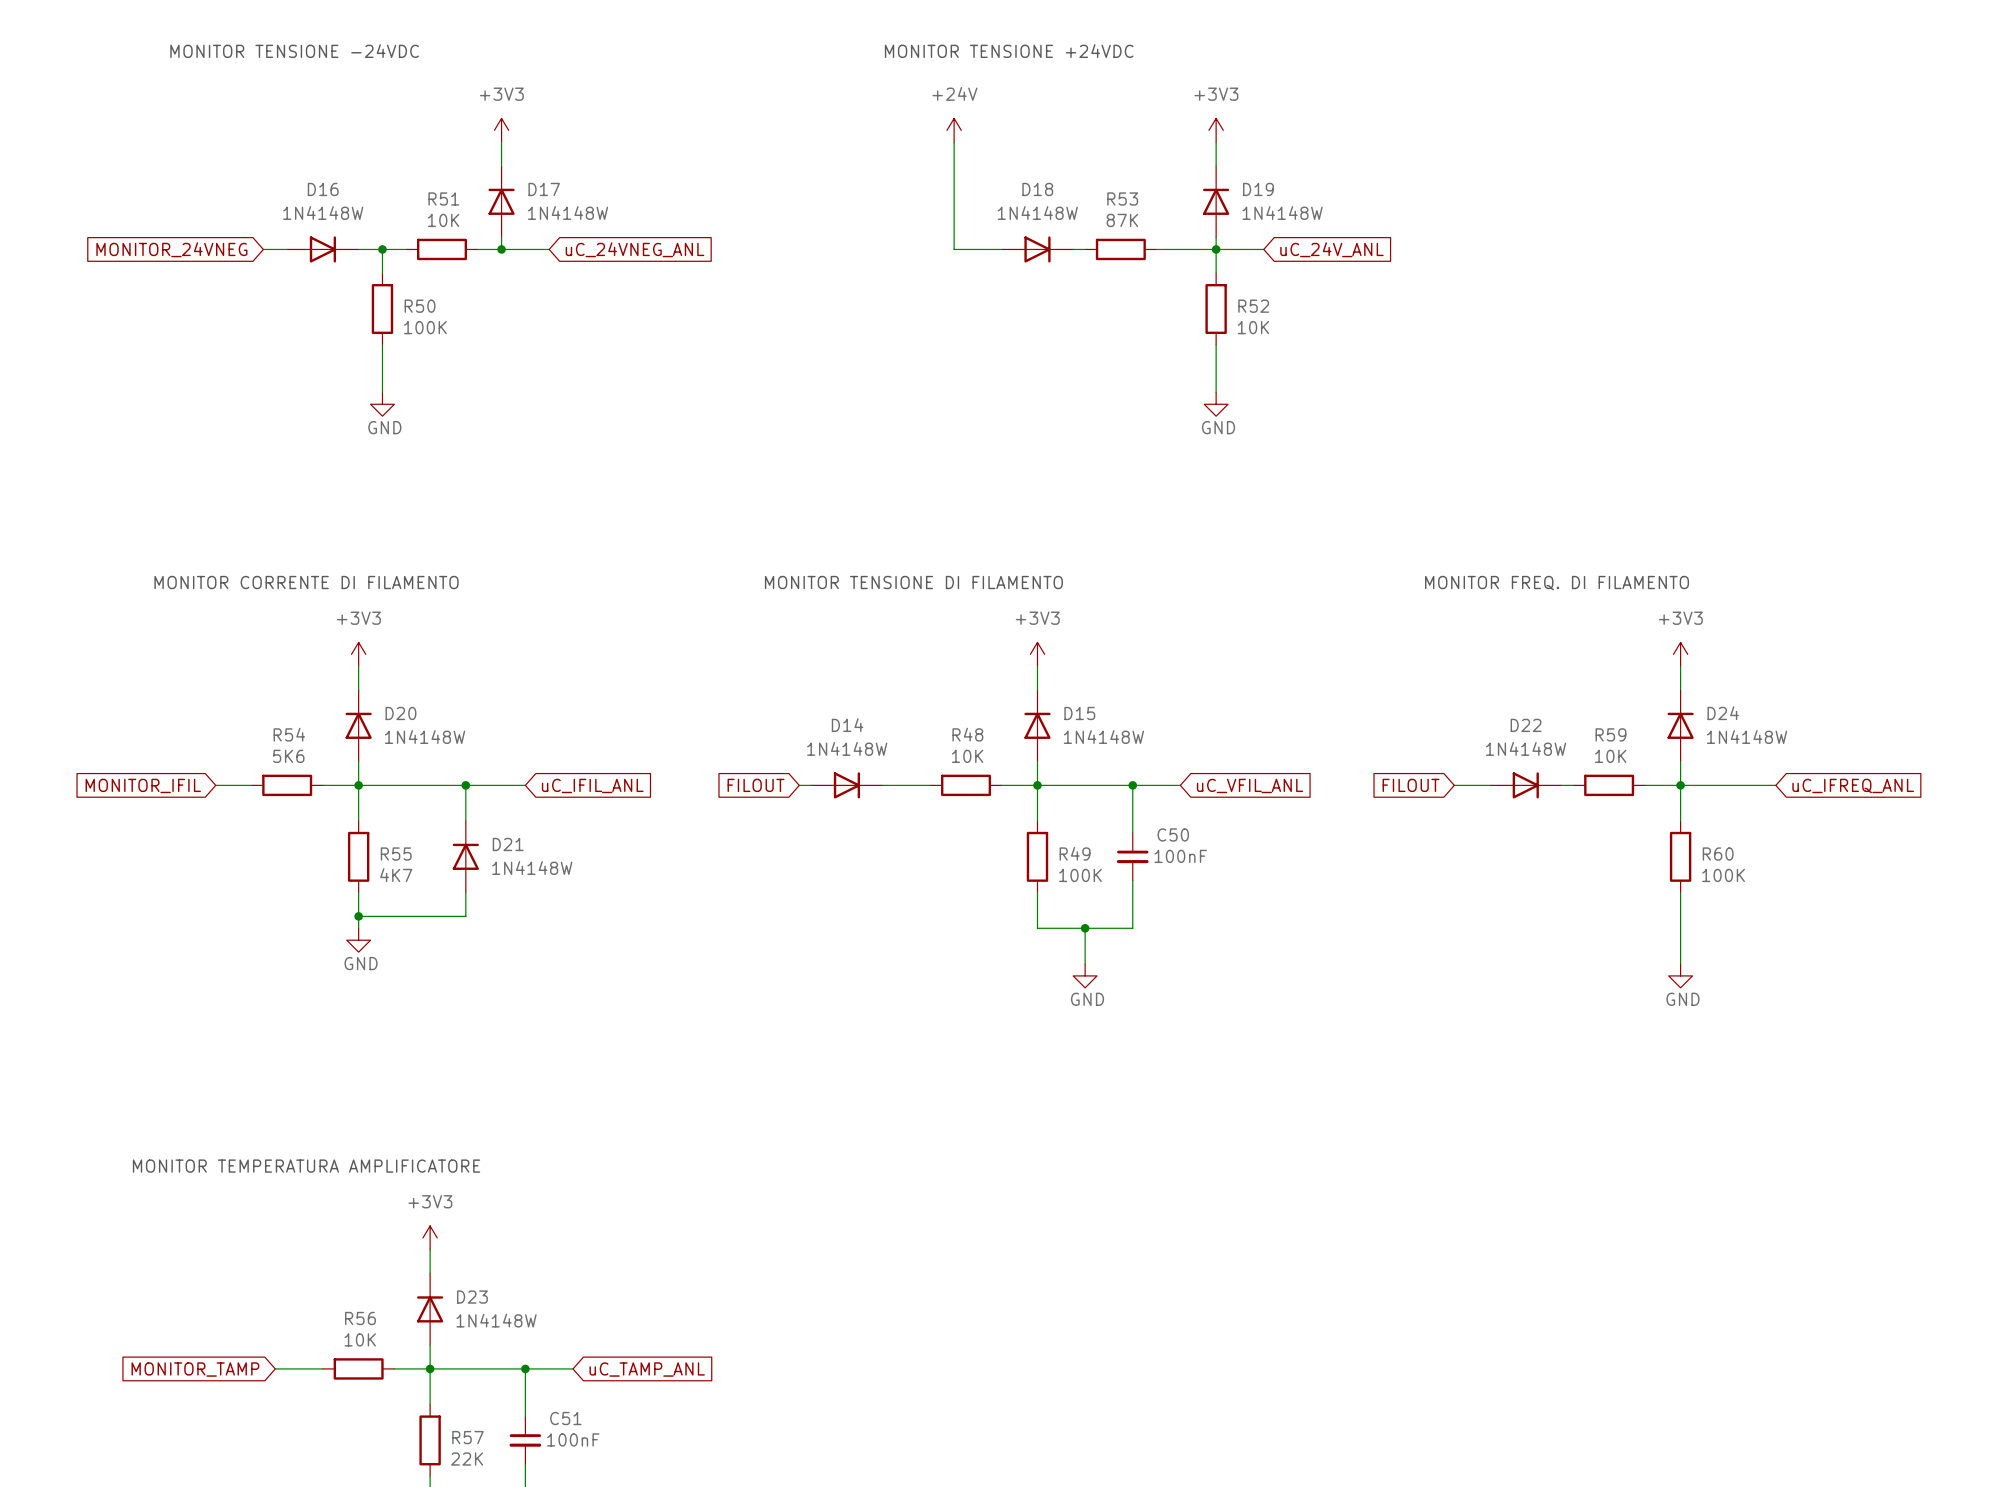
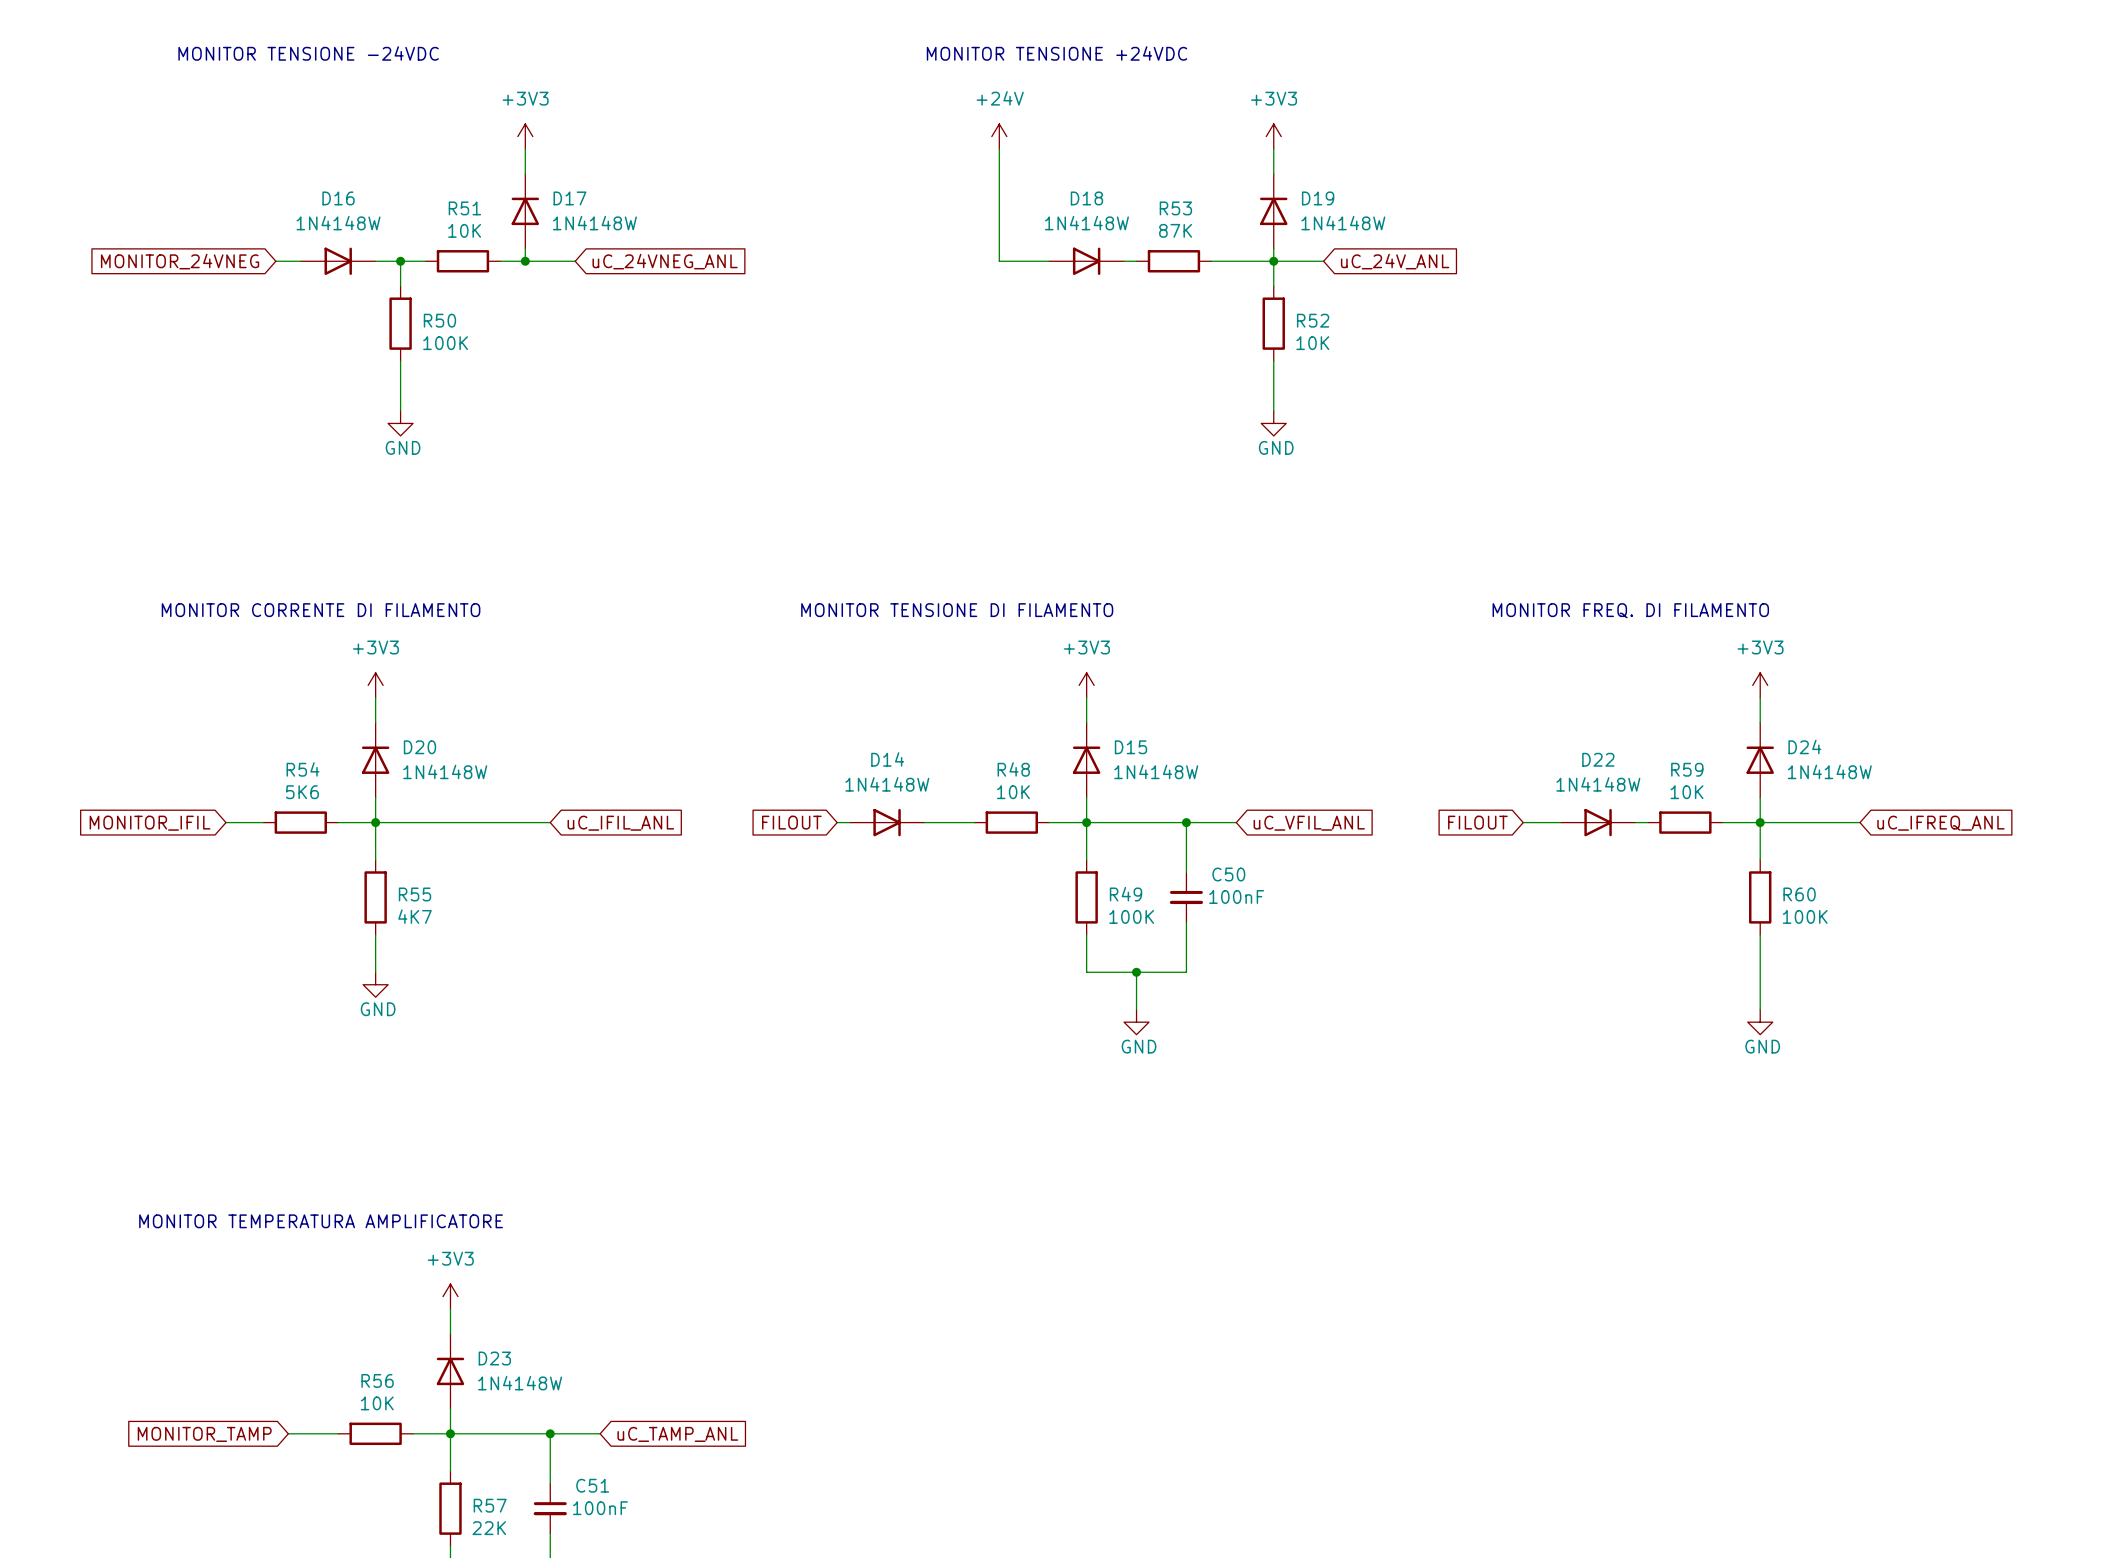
wire: (465, 785) (465, 821) -> none
junction: (465, 785) -> none
D21: 1N4148W (465, 856) -> none
wire: (465, 892) (465, 916) (358, 916) -> none
junction: (358, 916) -> none

